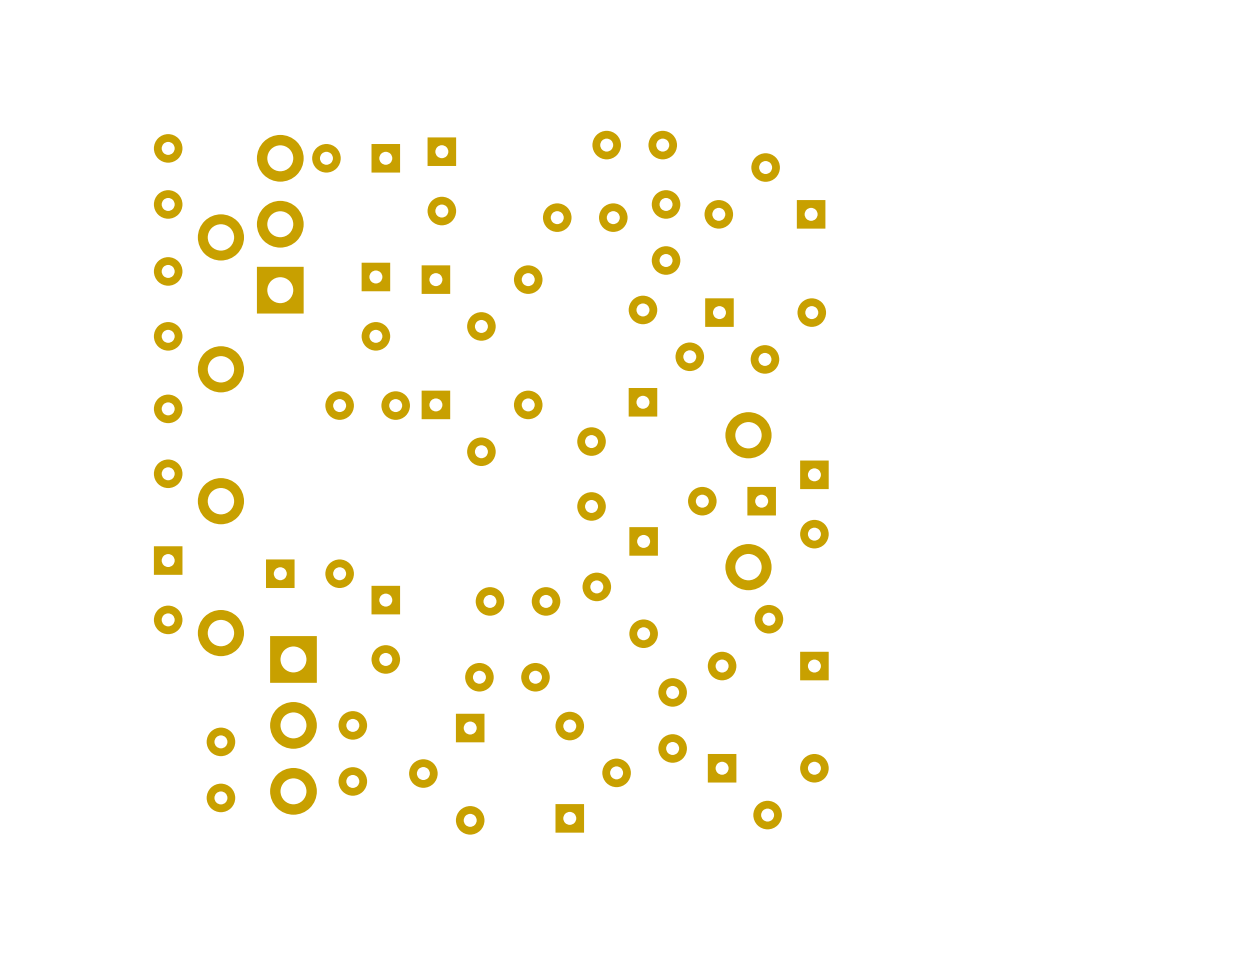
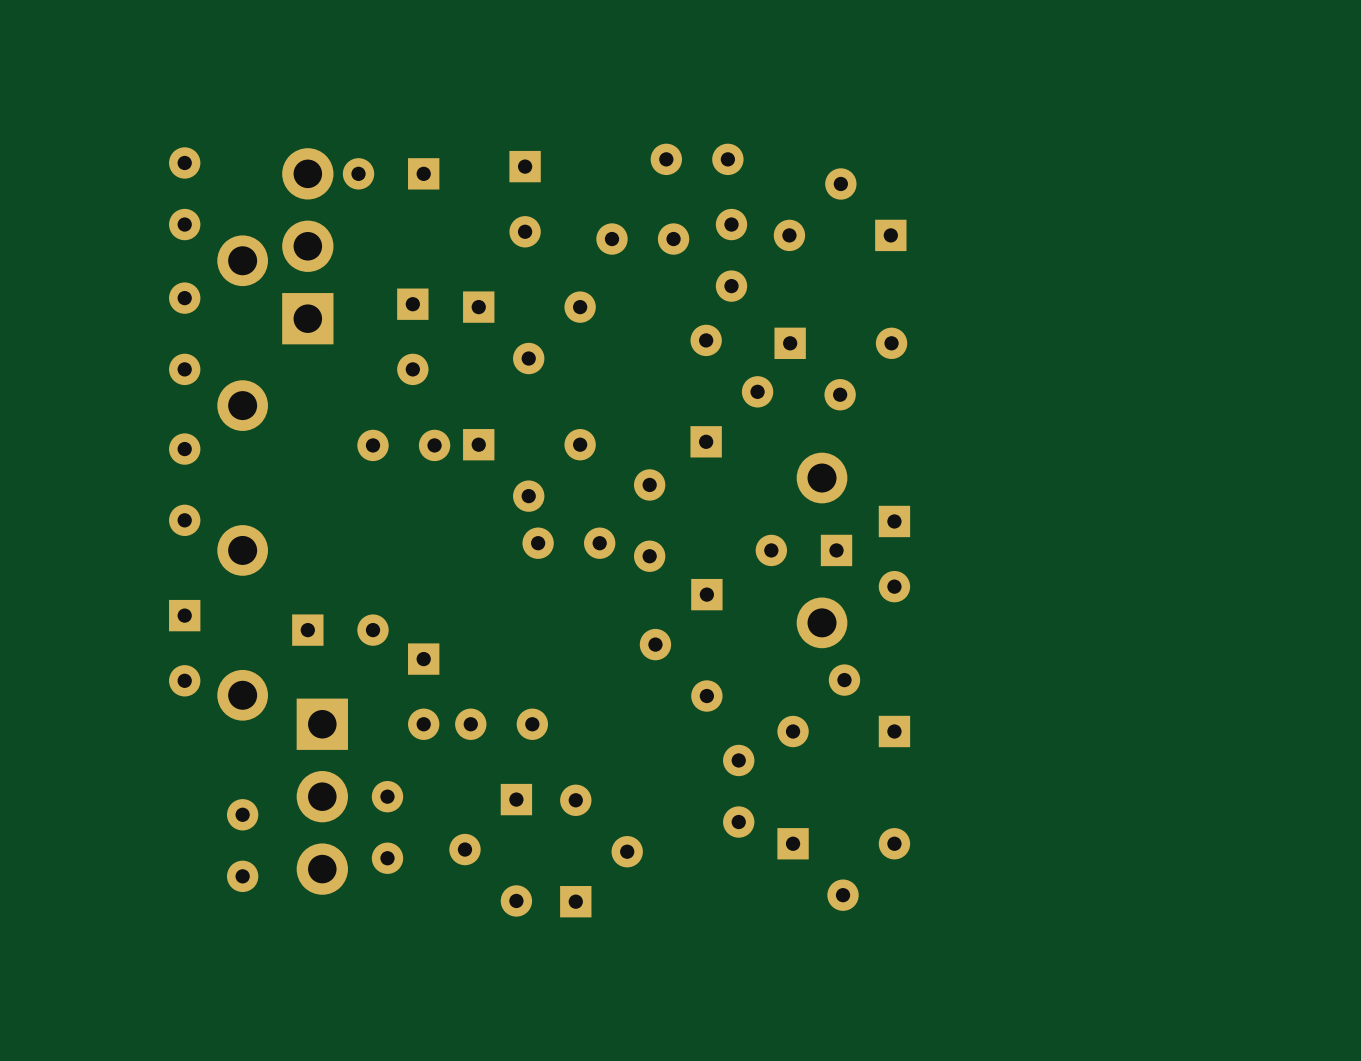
part position: (441, 181) -> (525, 199)
part: none -> (568, 543)
part: (518, 601) -> none
part: none -> (501, 724)
part: (507, 677) -> none
part position: (593, 772) -> (601, 850)

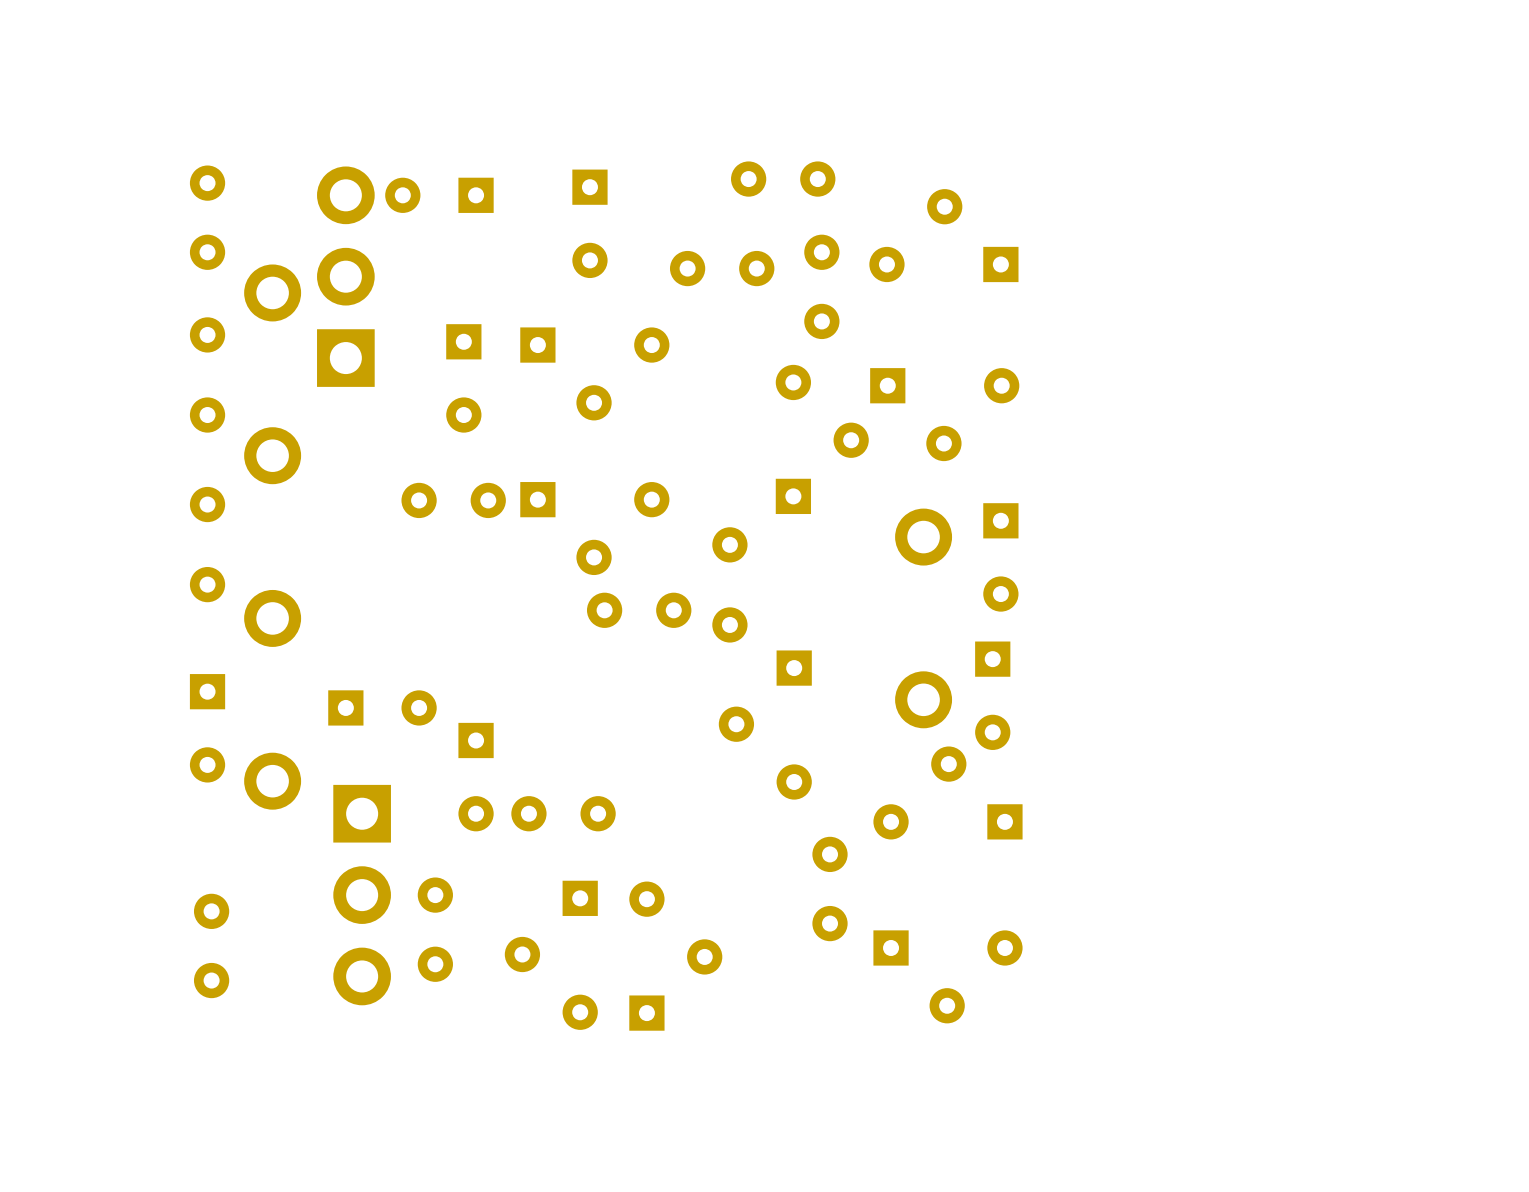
part: none -> (1000, 557)
part: (803, 550) -> none
part: (894, 554) -> none
part: none -> (992, 695)
part position: (242, 845) -> (211, 945)

